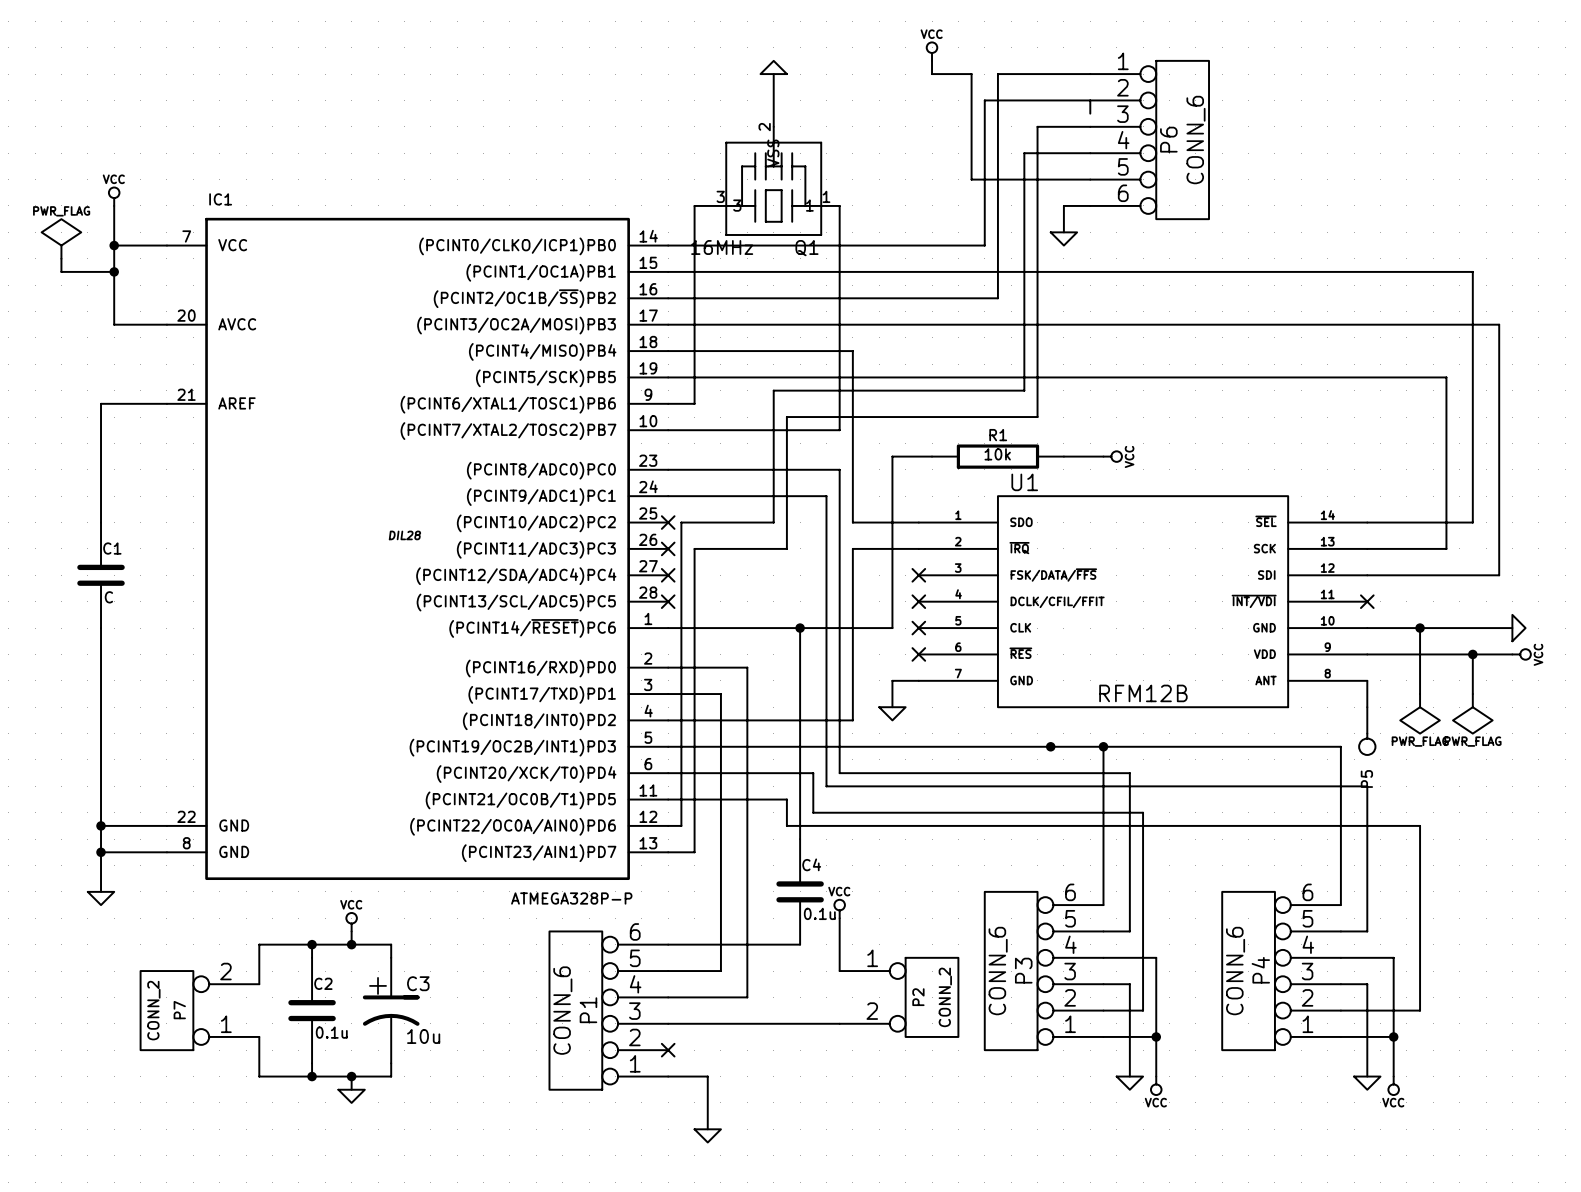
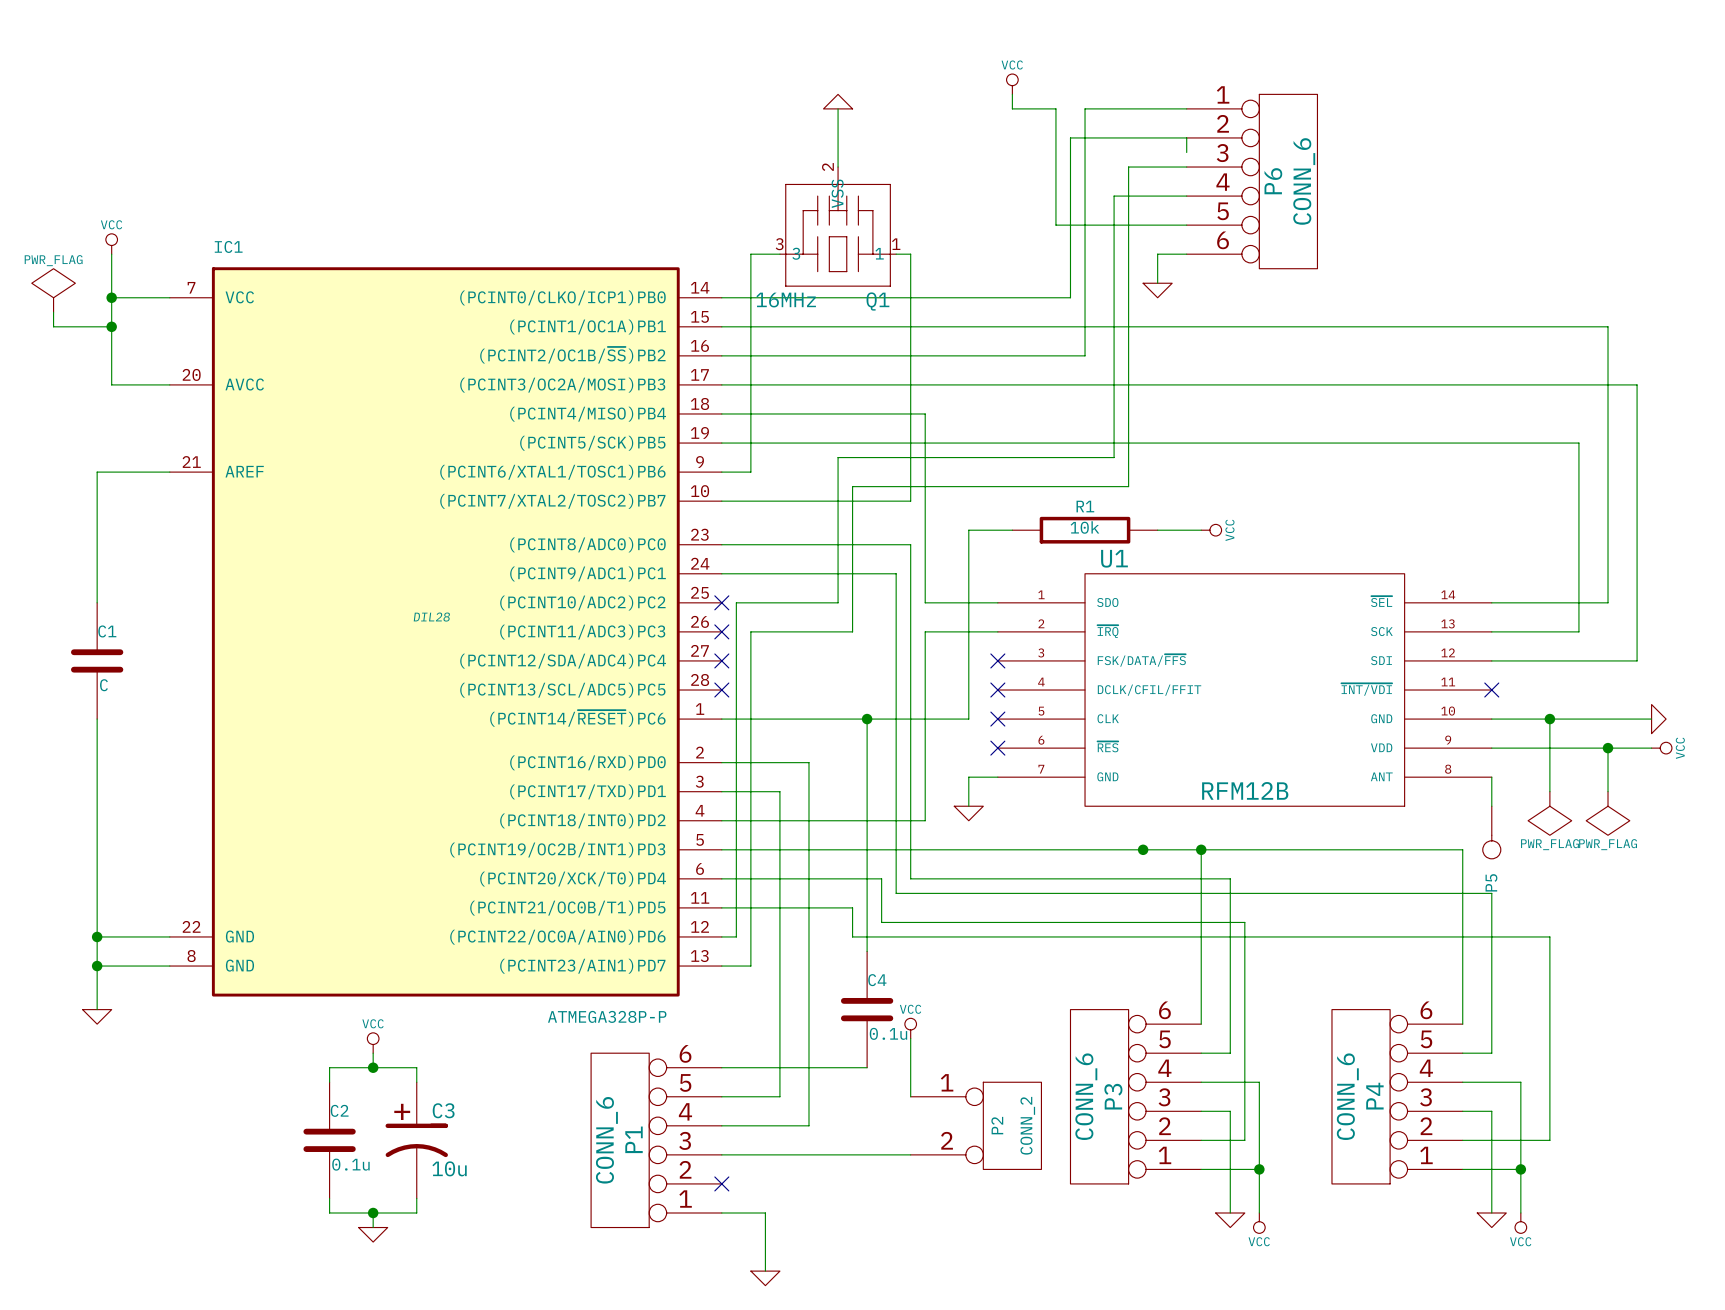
wire: (312, 944) (259, 944) (259, 984) -> none
junction: (312, 944) -> none
P7: CONN_2 (199, 1010) -> none
wire: (259, 1036) (259, 1076) (312, 1076) -> none
junction: (312, 1076) -> none

